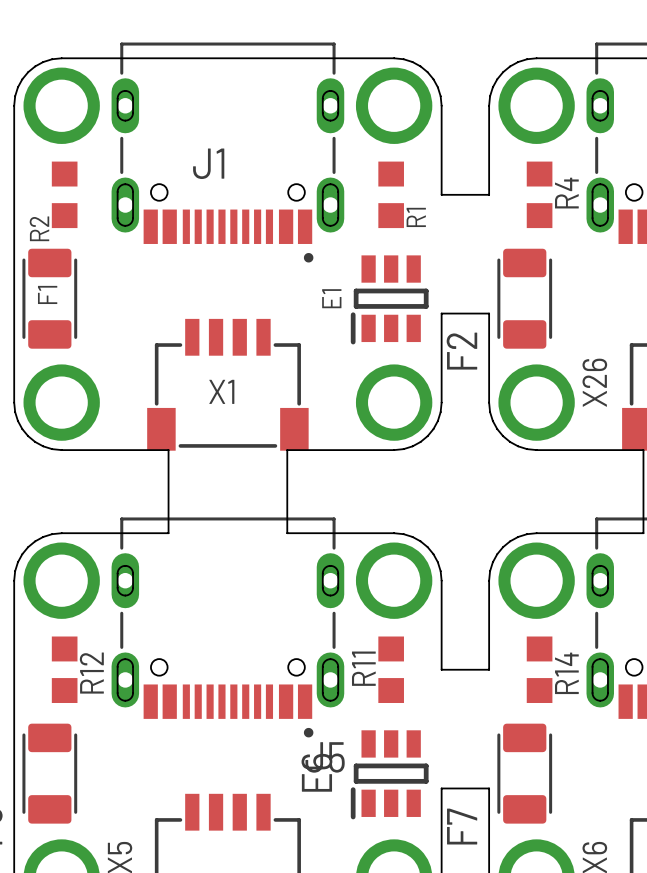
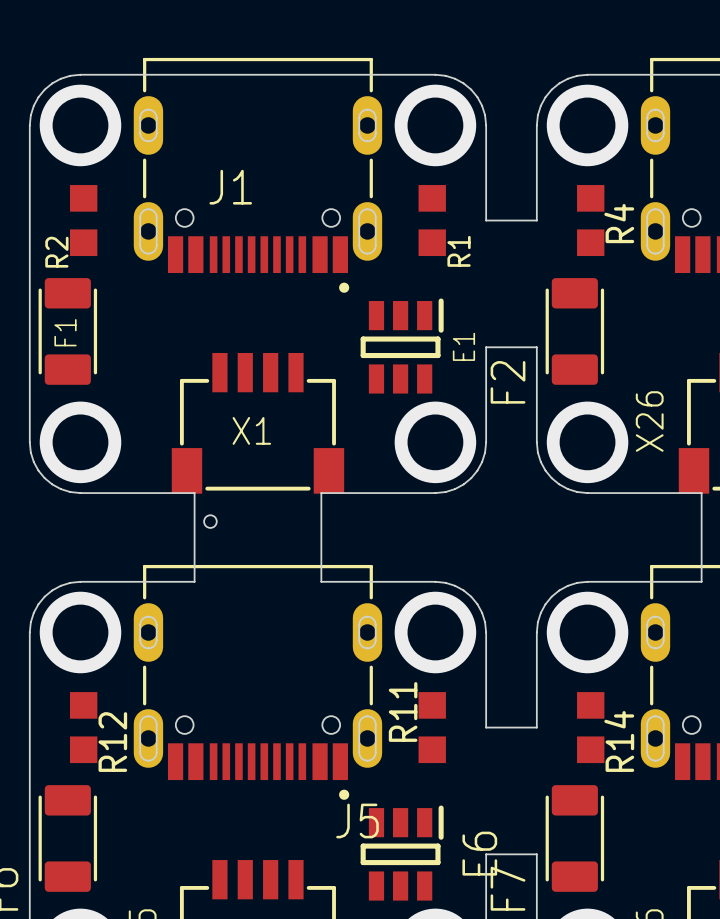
E1 rotation: 0° (389, 299) -> 180° (402, 346)
round board edge: none -> [203, 515, 217, 529]
E6 rotation: 0° (389, 774) -> 180° (402, 853)

